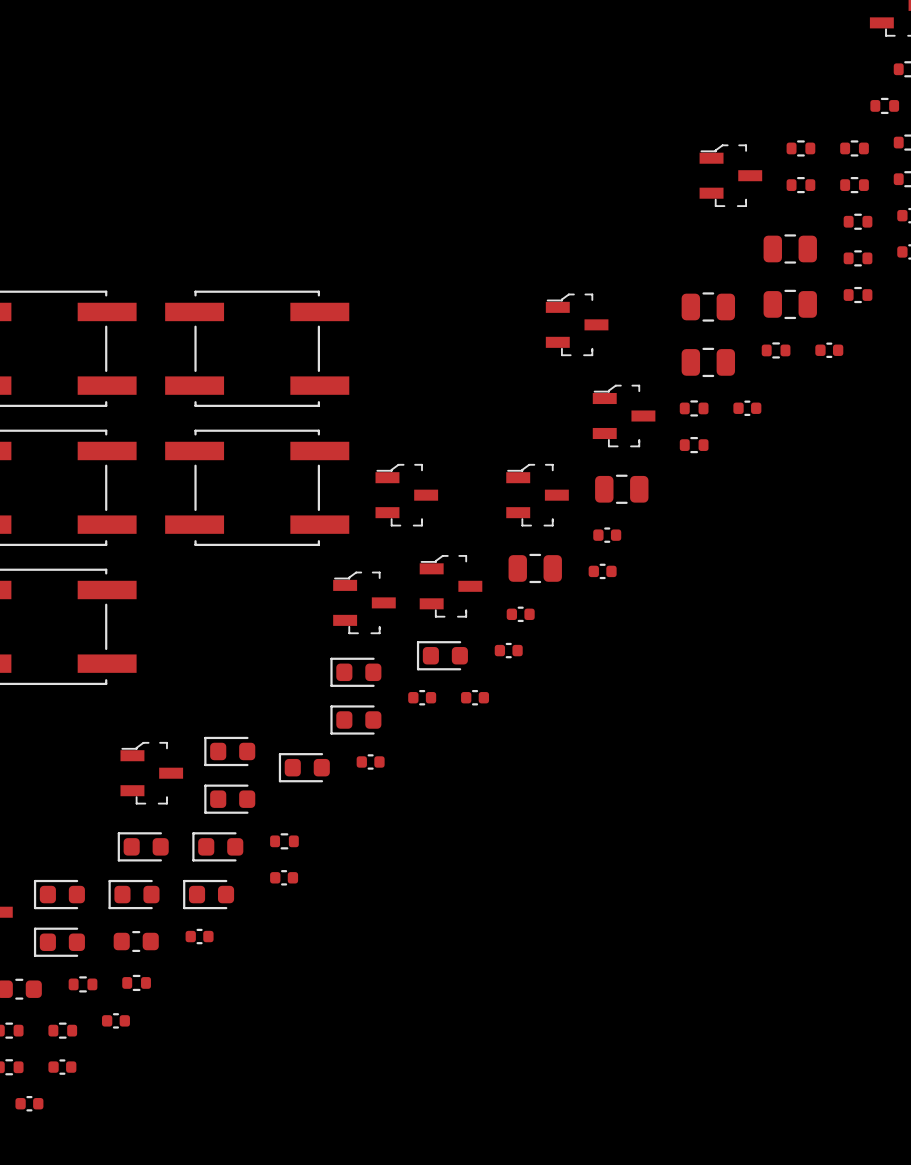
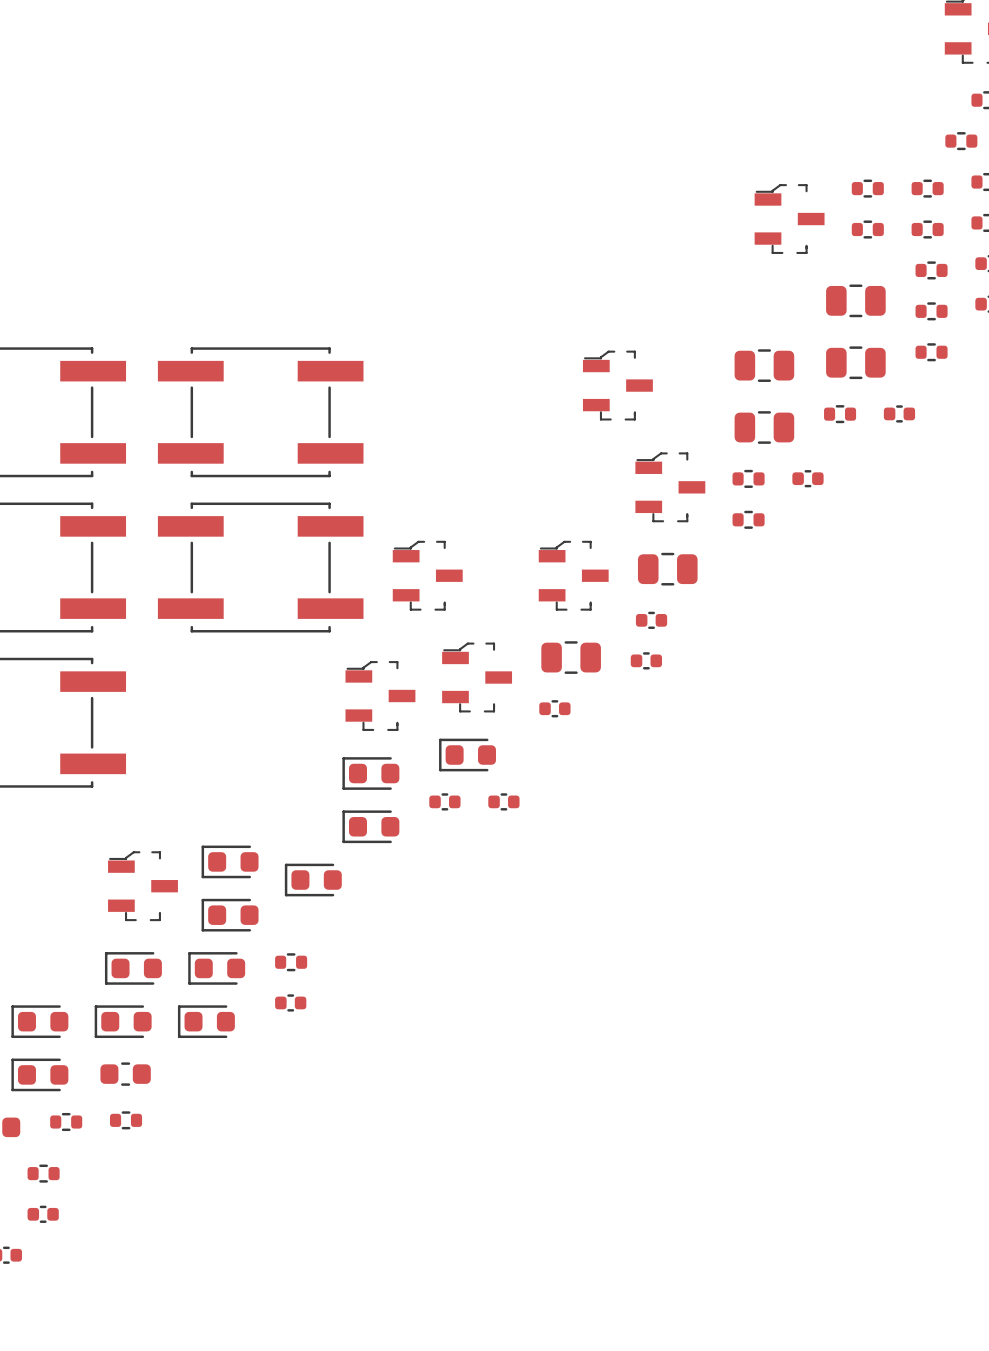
part: (508, 650) -> none
part: (370, 761) -> none
part: (199, 936) -> none
part: (115, 1020) -> none

